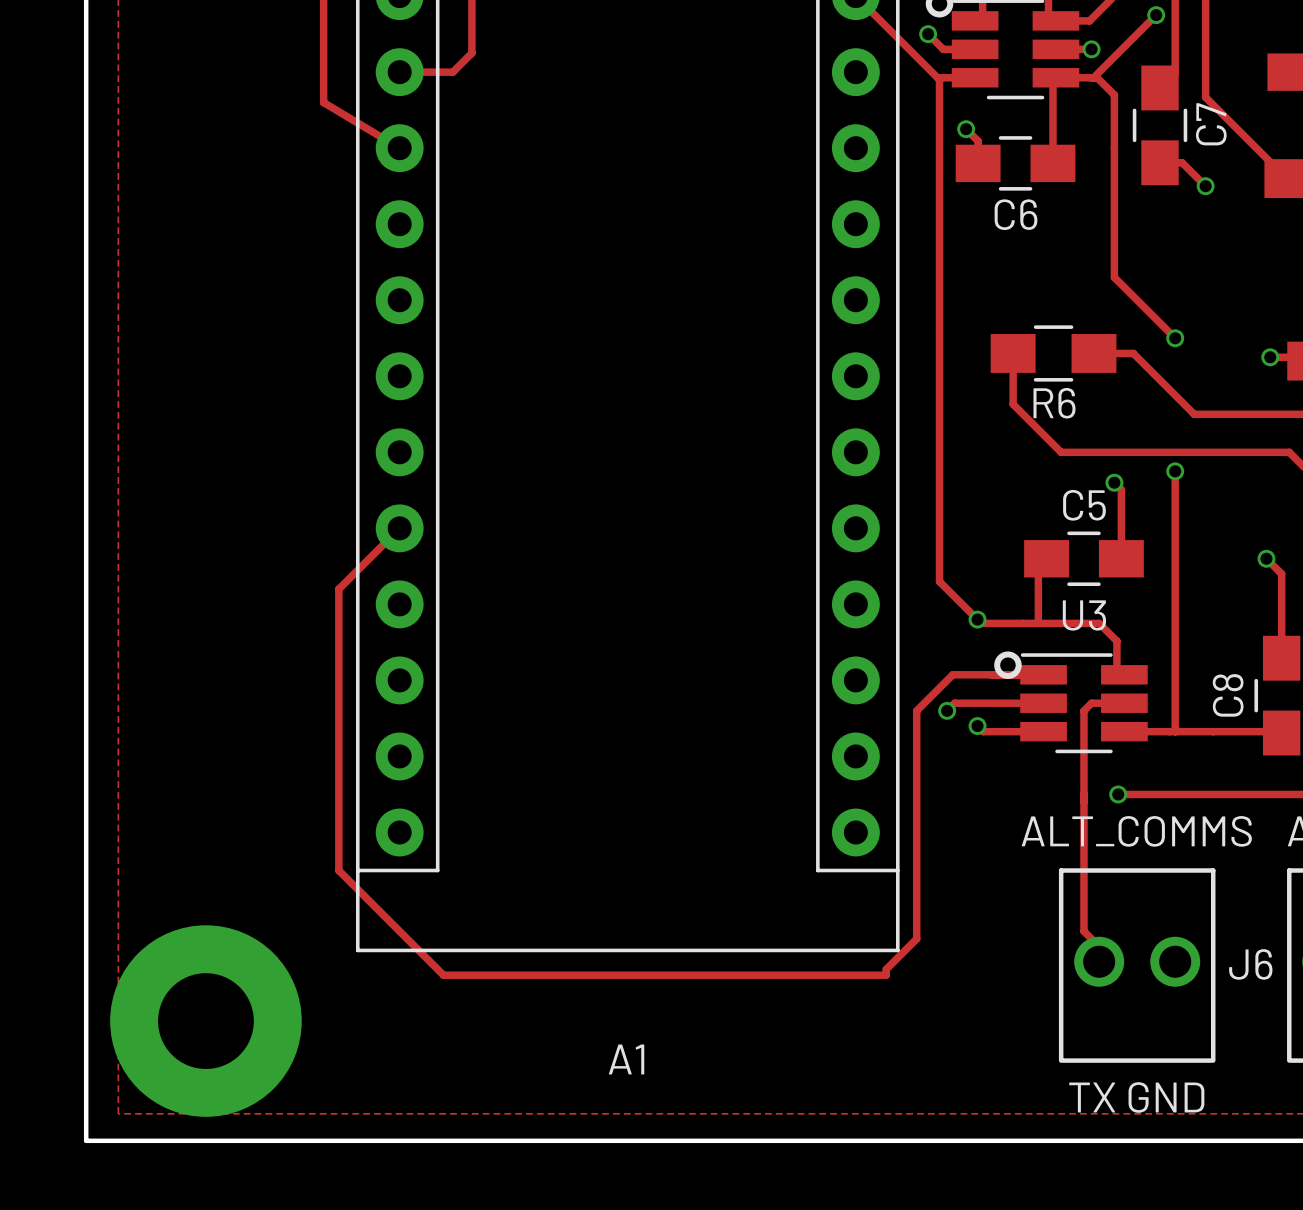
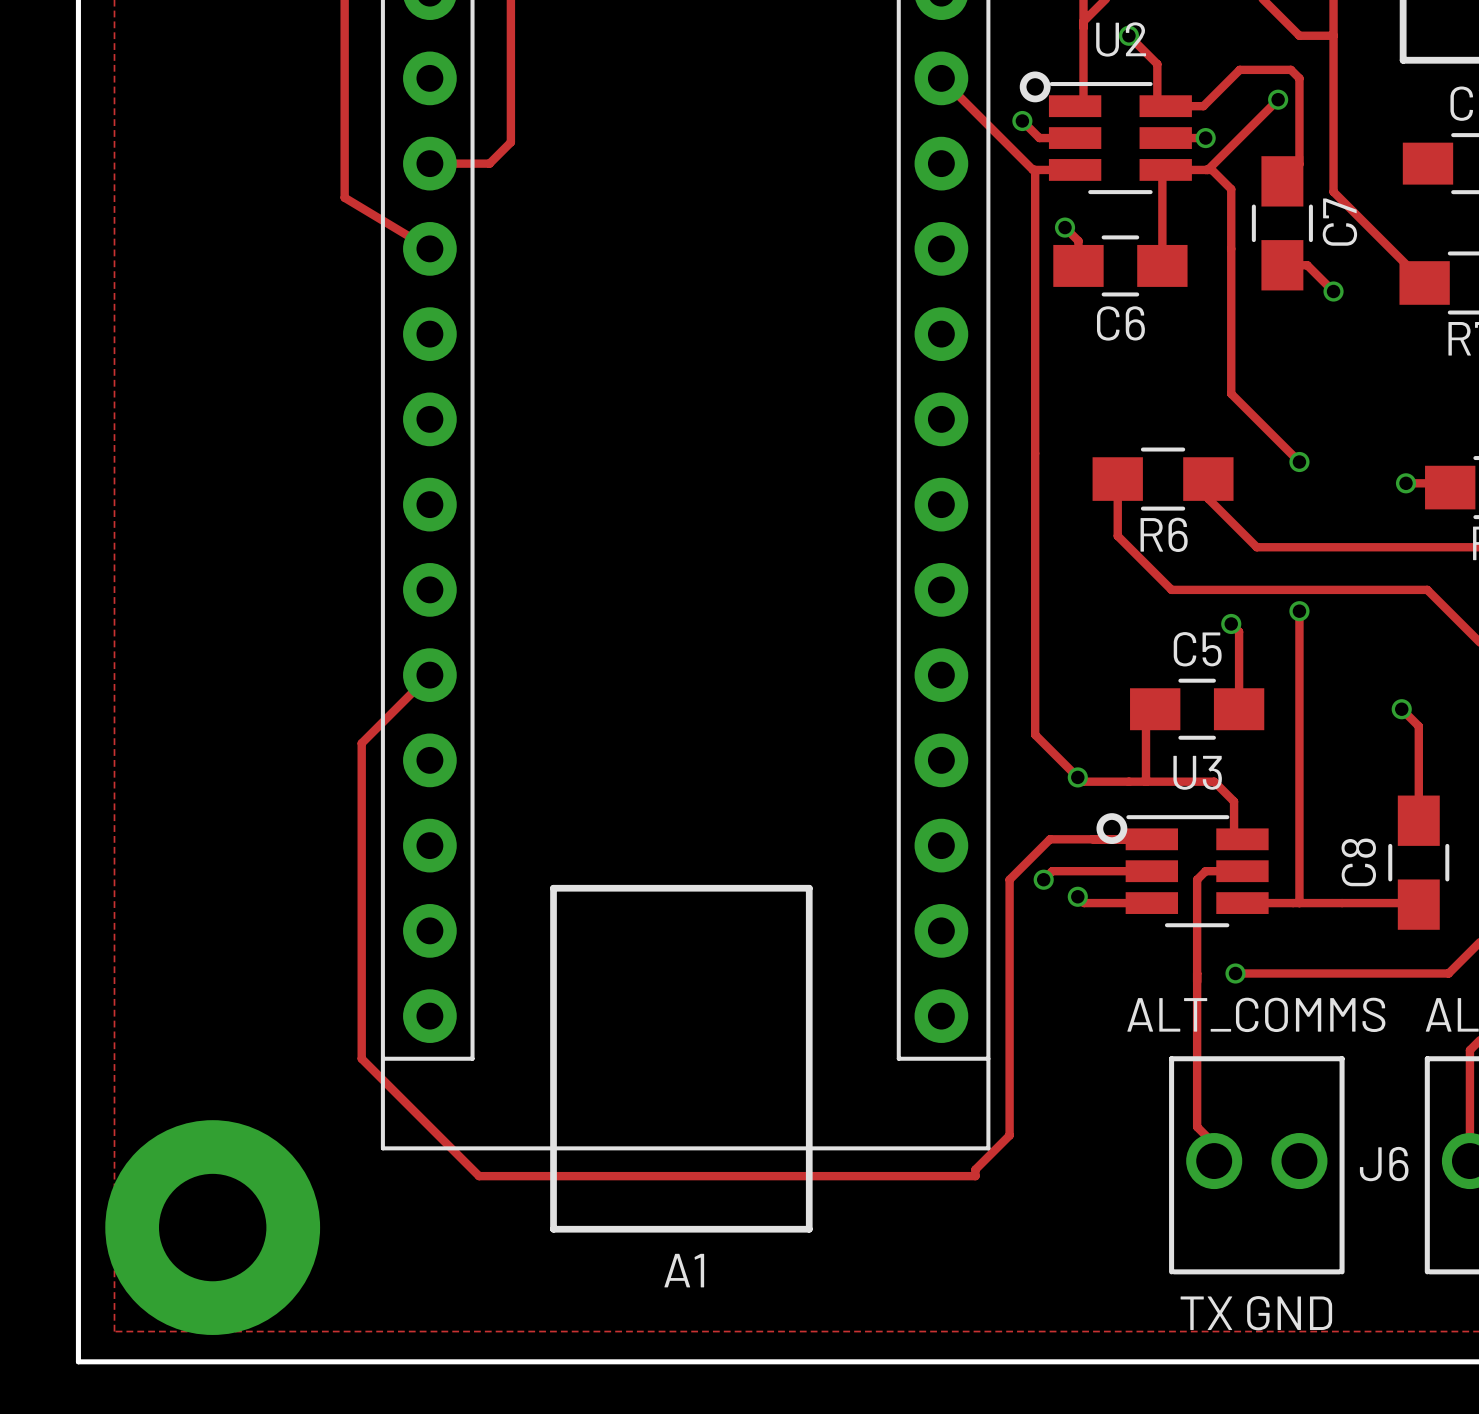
track: (1093, 353) (1133, 353) (1194, 414) -> (1208, 479) (1208, 498) (1256, 547) (1320, 547)
line: none -> (553, 888) (553, 1229) (809, 1229) (809, 888) (553, 888)

